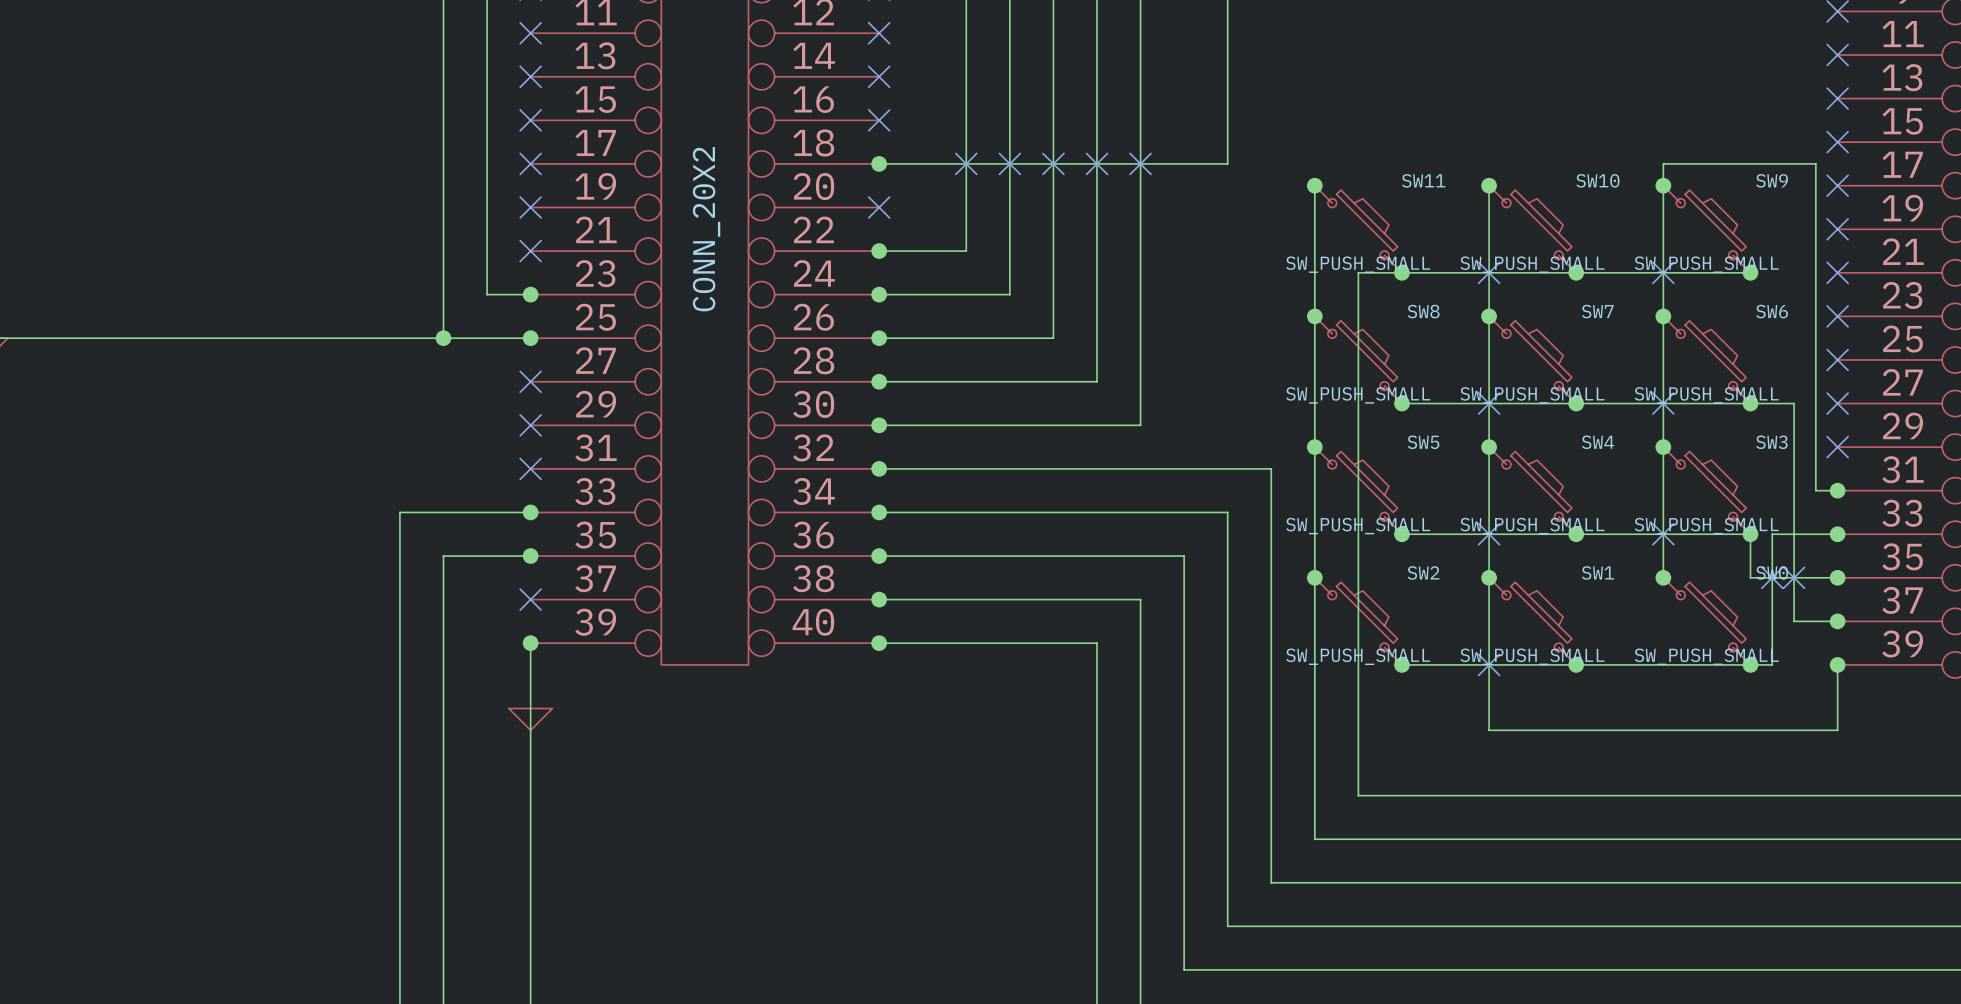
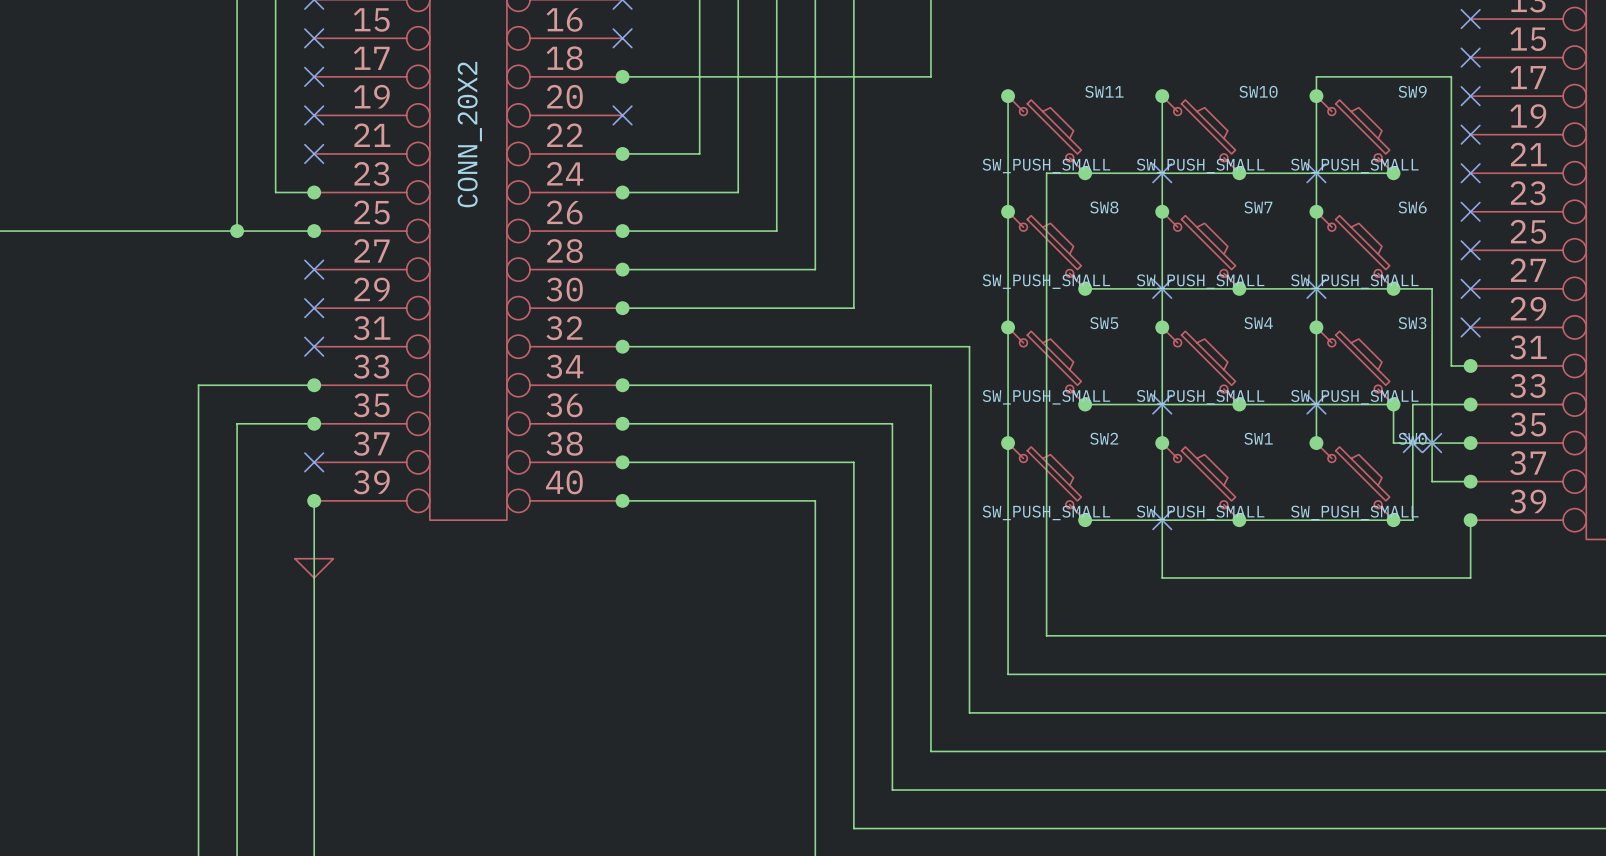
no-connect mark: (966, 163) -> none
no-connect mark: (1009, 163) -> none
no-connect mark: (1053, 163) -> none
no-connect mark: (1097, 163) -> none
no-connect mark: (1140, 163) -> none

